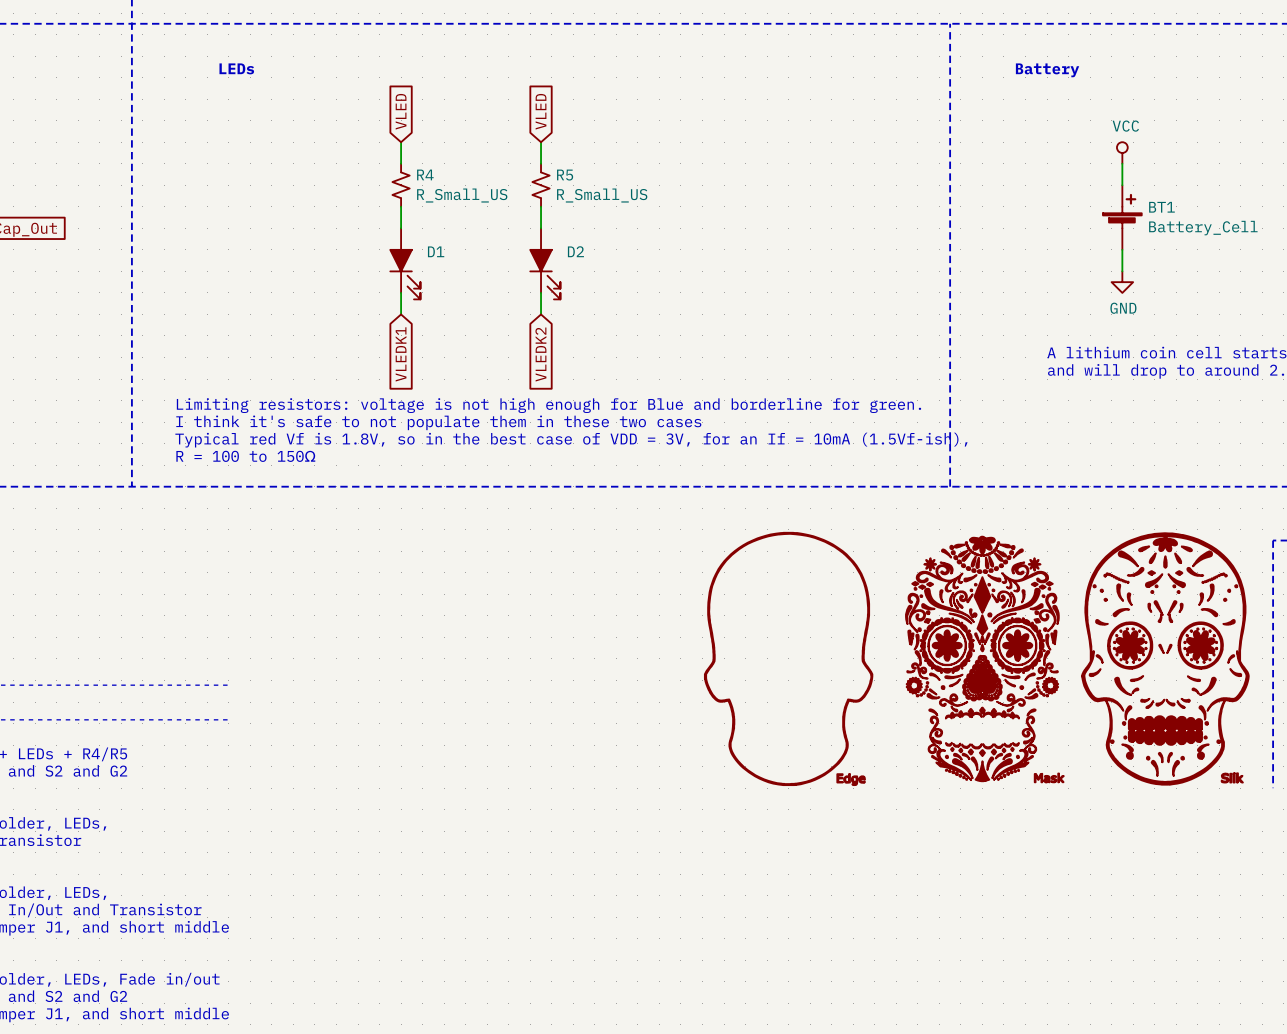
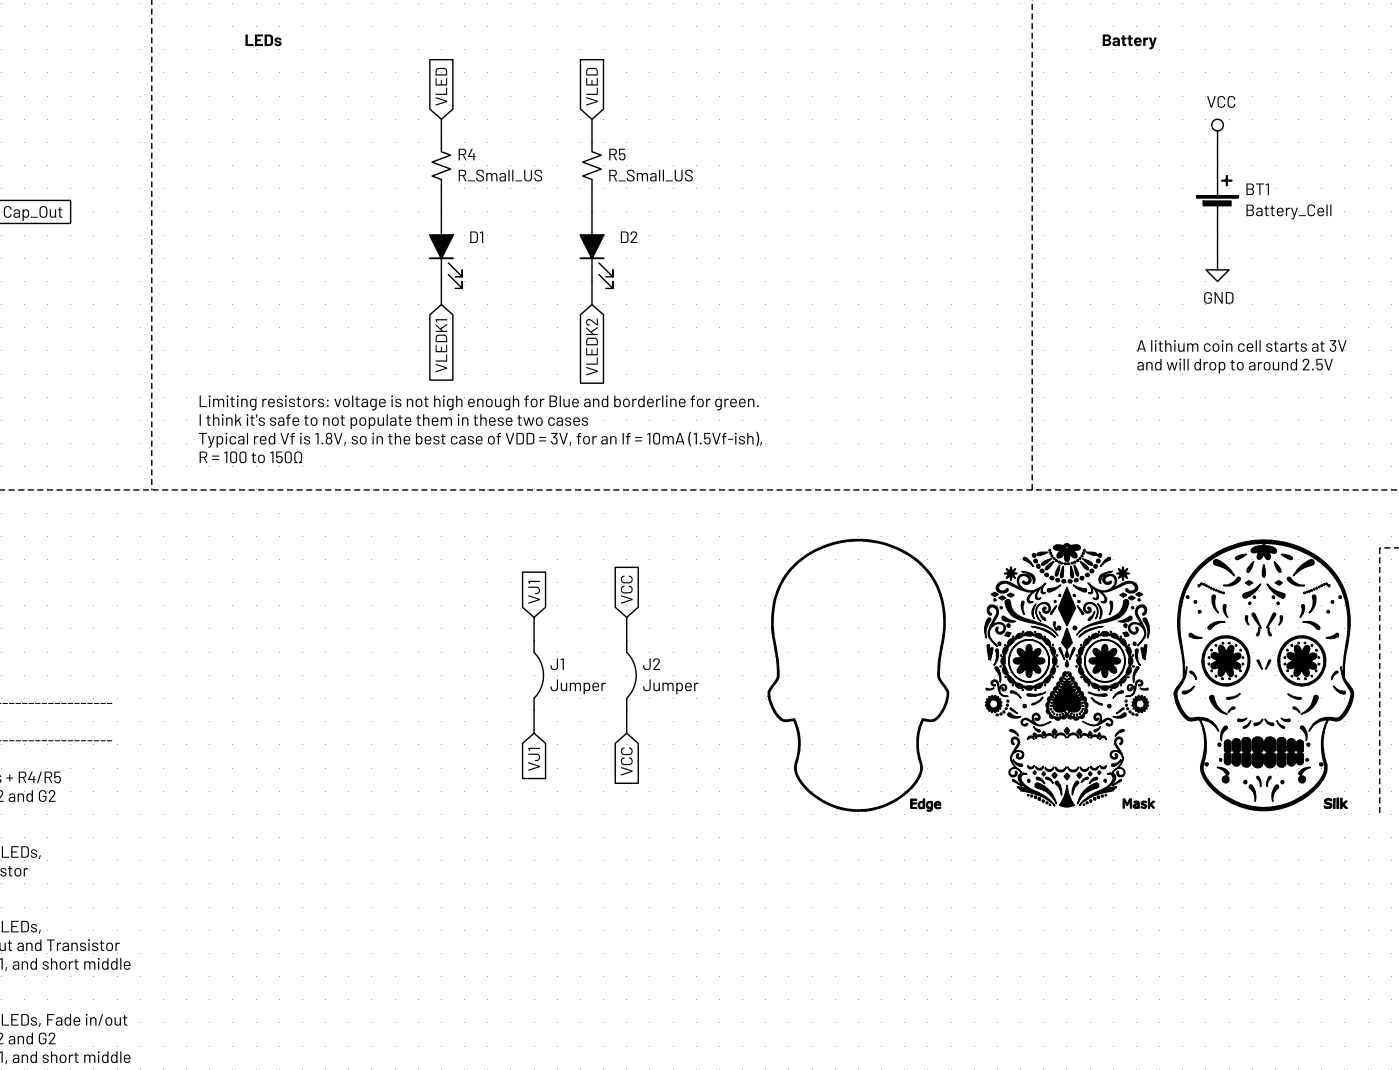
global label: none -> VJ1 (534, 592)
global label: none -> VCC (626, 589)
wire: none -> (534, 617) (534, 640)
wire: none -> (626, 617) (626, 640)
J1: none -> Jumper (538, 675)
J2: none -> Jumper (631, 675)
wire: none -> (534, 710) (534, 733)
wire: none -> (626, 710) (626, 733)
global label: none -> VJ1 (534, 759)
global label: none -> VCC (626, 761)

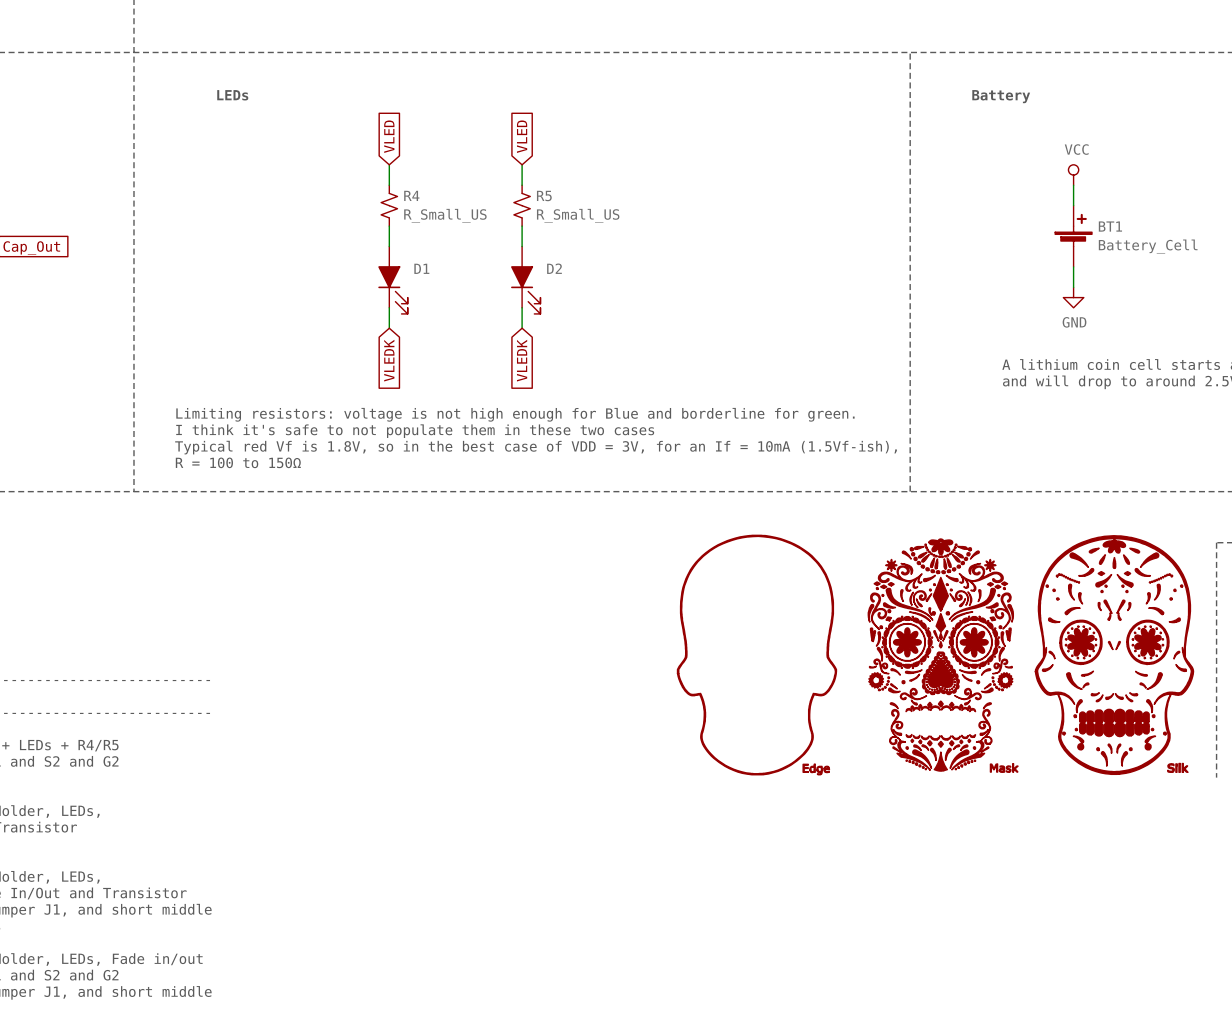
global label: VLEDK1 (441, 345) -> VLEDK (389, 360)
global label: VLEDK2 (591, 347) -> VLEDK (522, 360)
global label: VCC (626, 589) -> none
global label: VJ1 (534, 592) -> none
wire: (534, 617) (534, 640) -> none
wire: (626, 617) (626, 640) -> none
J1: Jumper (538, 675) -> none
J2: Jumper (631, 675) -> none
wire: (534, 710) (534, 733) -> none
wire: (626, 710) (626, 733) -> none
global label: VJ1 (534, 759) -> none
global label: VCC (626, 761) -> none

